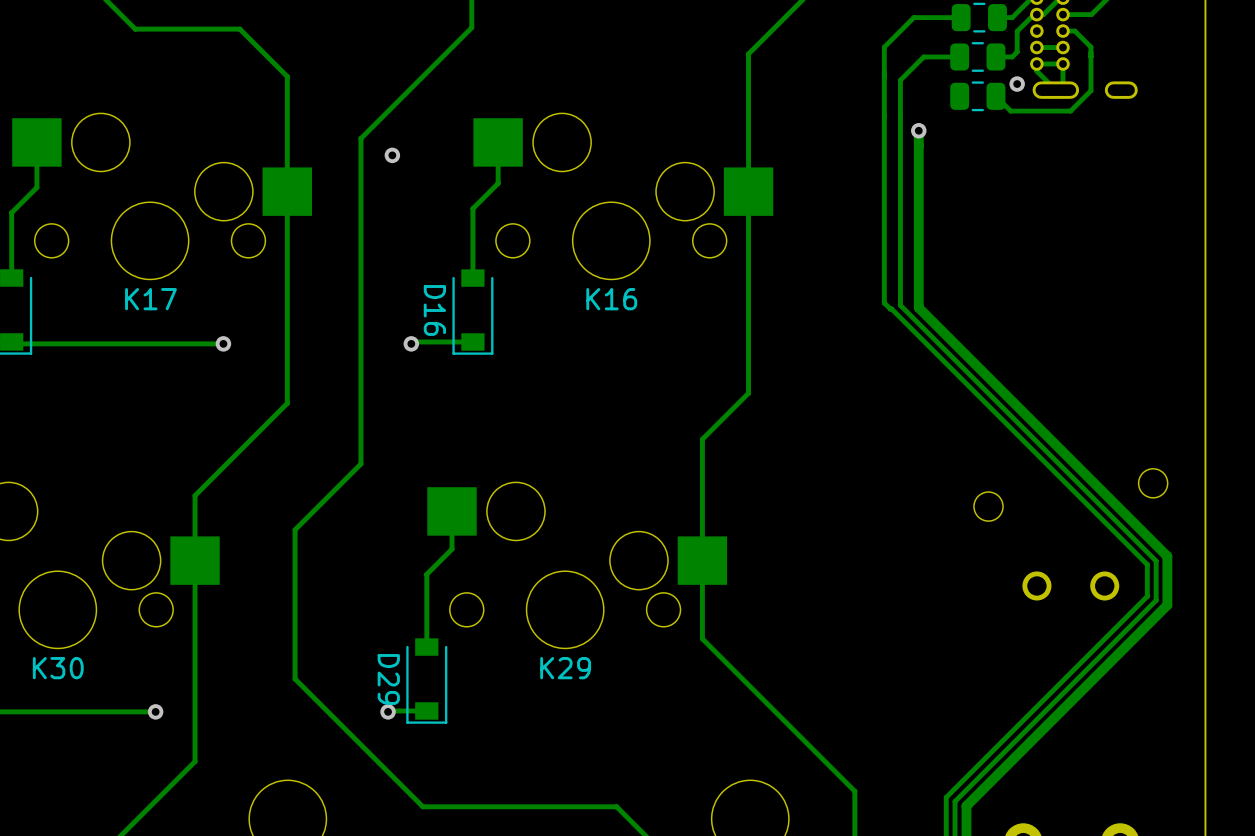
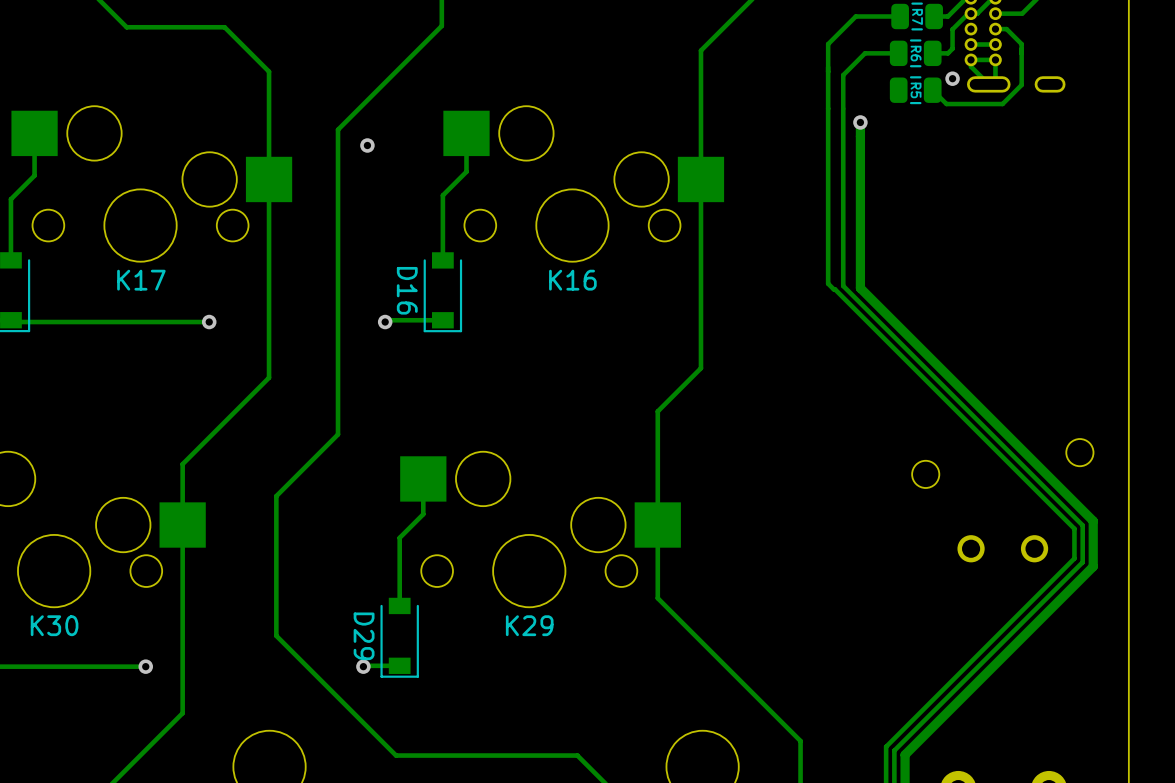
R7 name: none -> R7 (917, 16)
R6 name: none -> R6 (916, 53)
R5 name: none -> R5 (916, 90)

